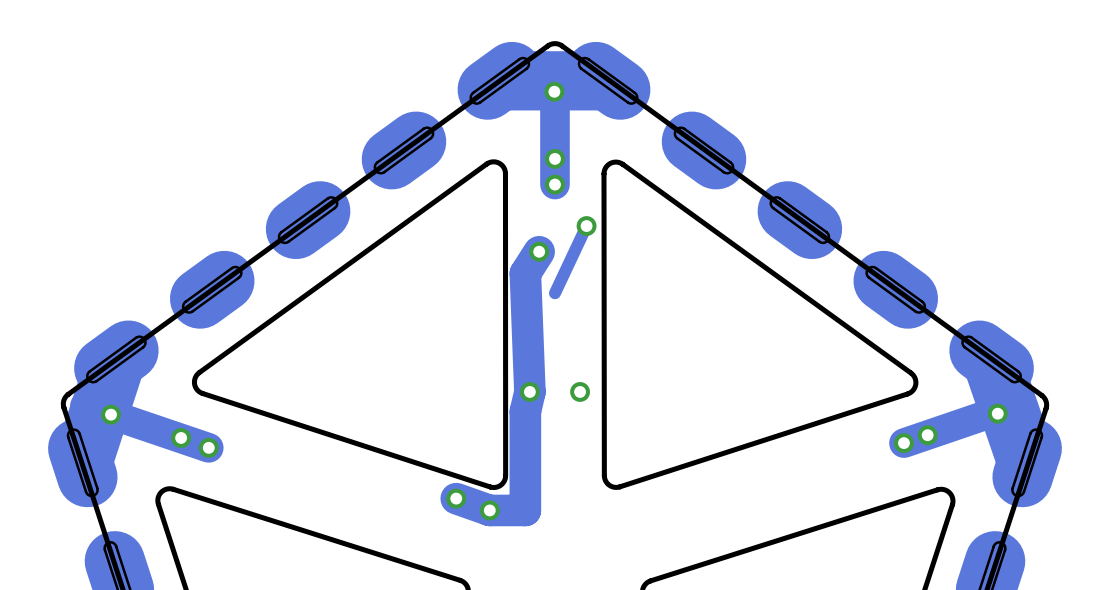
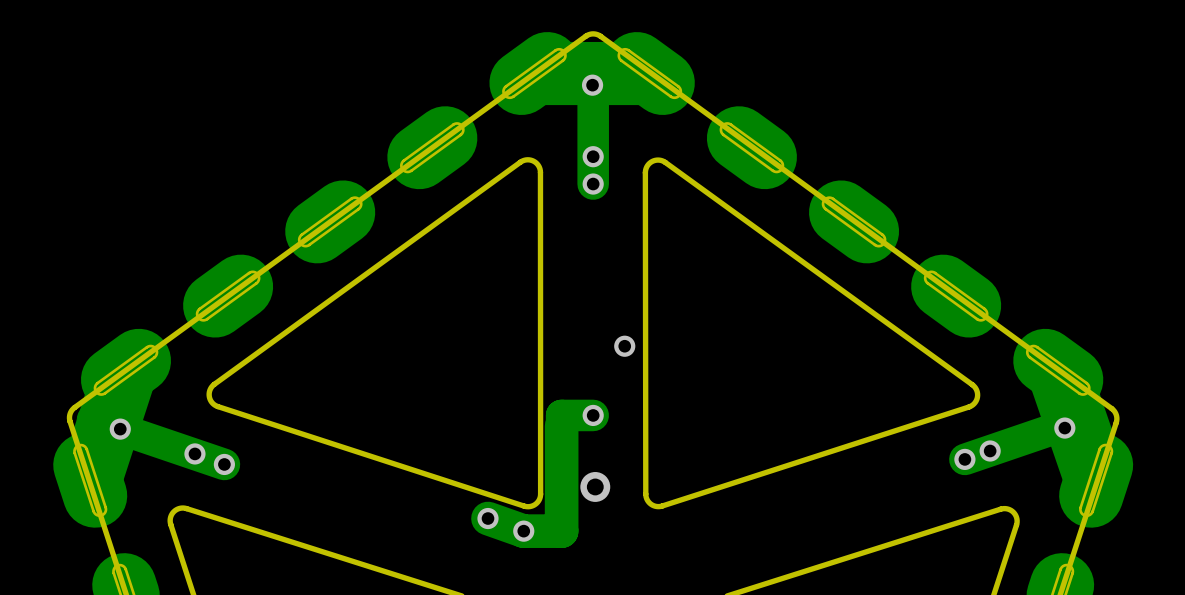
track: (586, 226) (554, 293) -> none
via: (586, 226) -> none
track: (539, 251) (525, 273) (529, 391) (525, 411) -> (593, 415) (561, 415) (561, 425)
via: (539, 251) -> none
via: none -> (624, 346)
via: (529, 391) -> none
via: (580, 391) -> none
via: none -> (593, 415)
via: none -> (595, 486)

